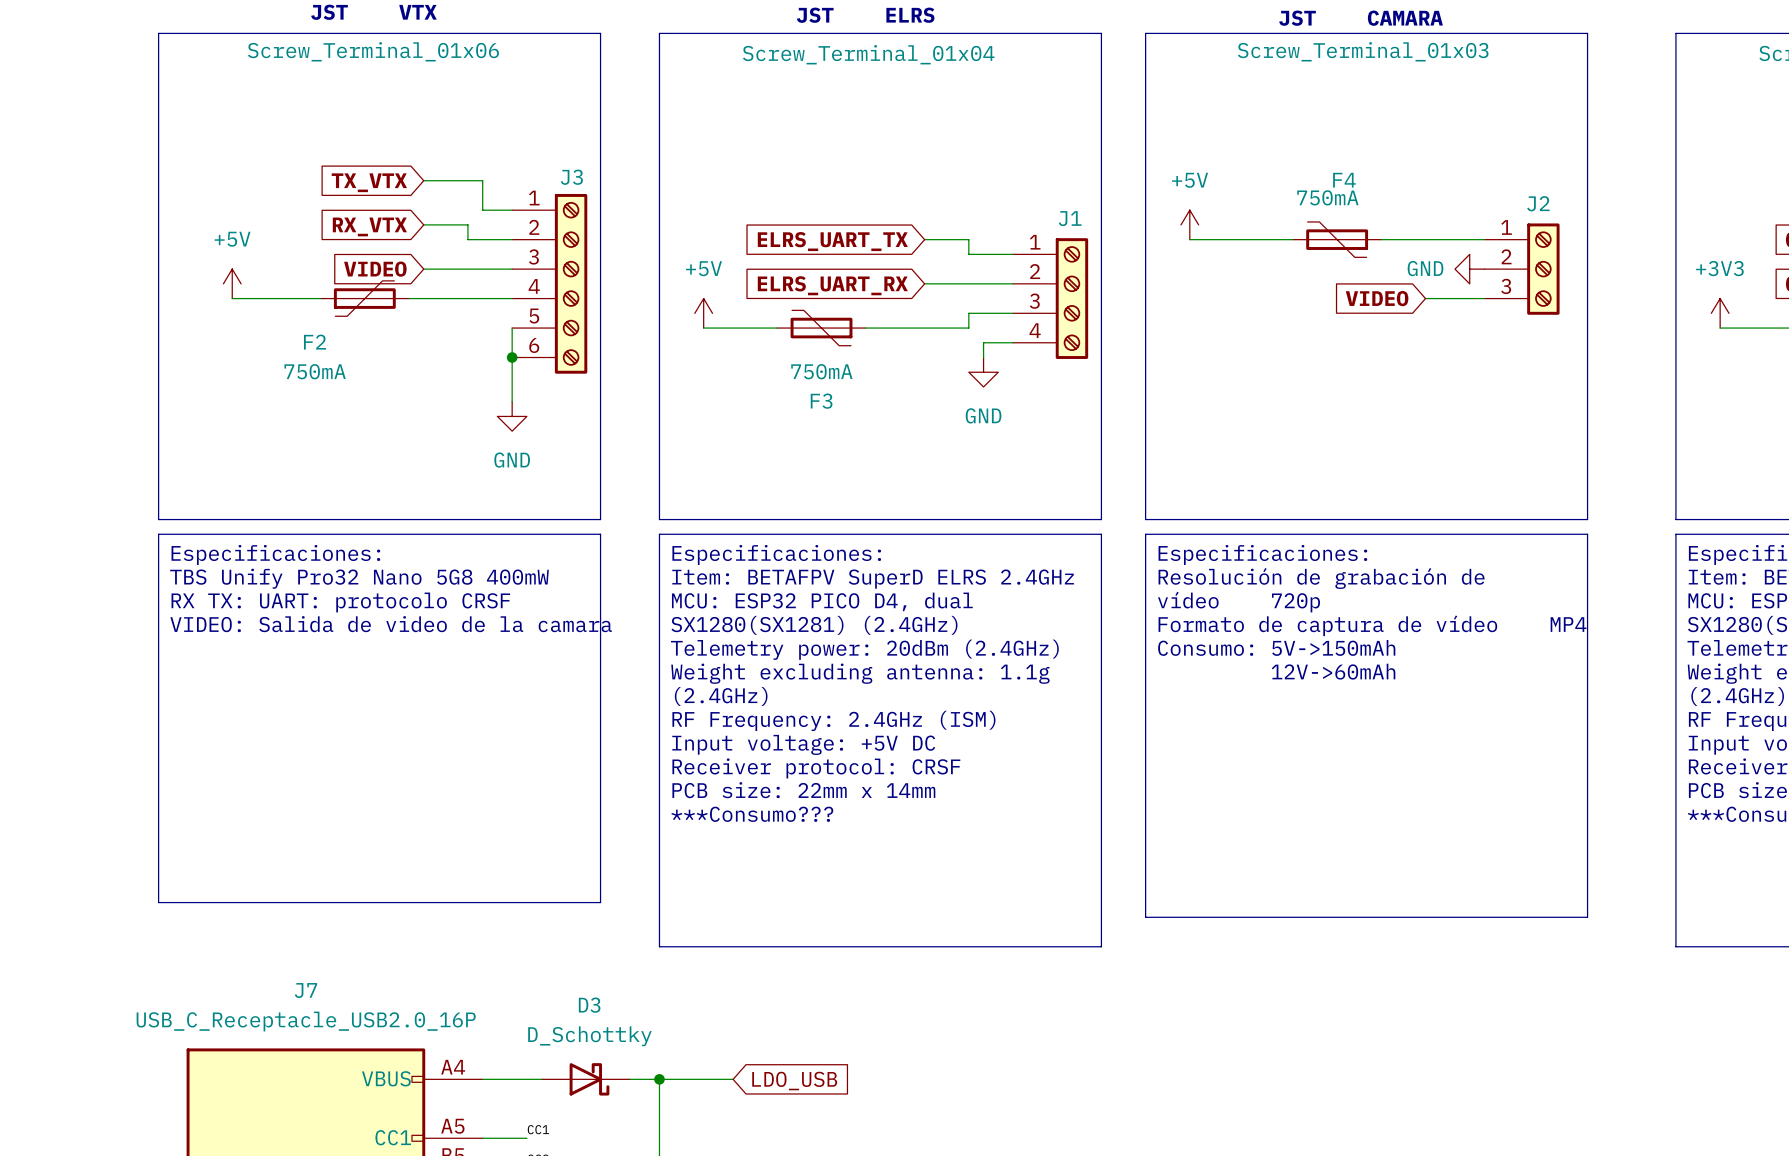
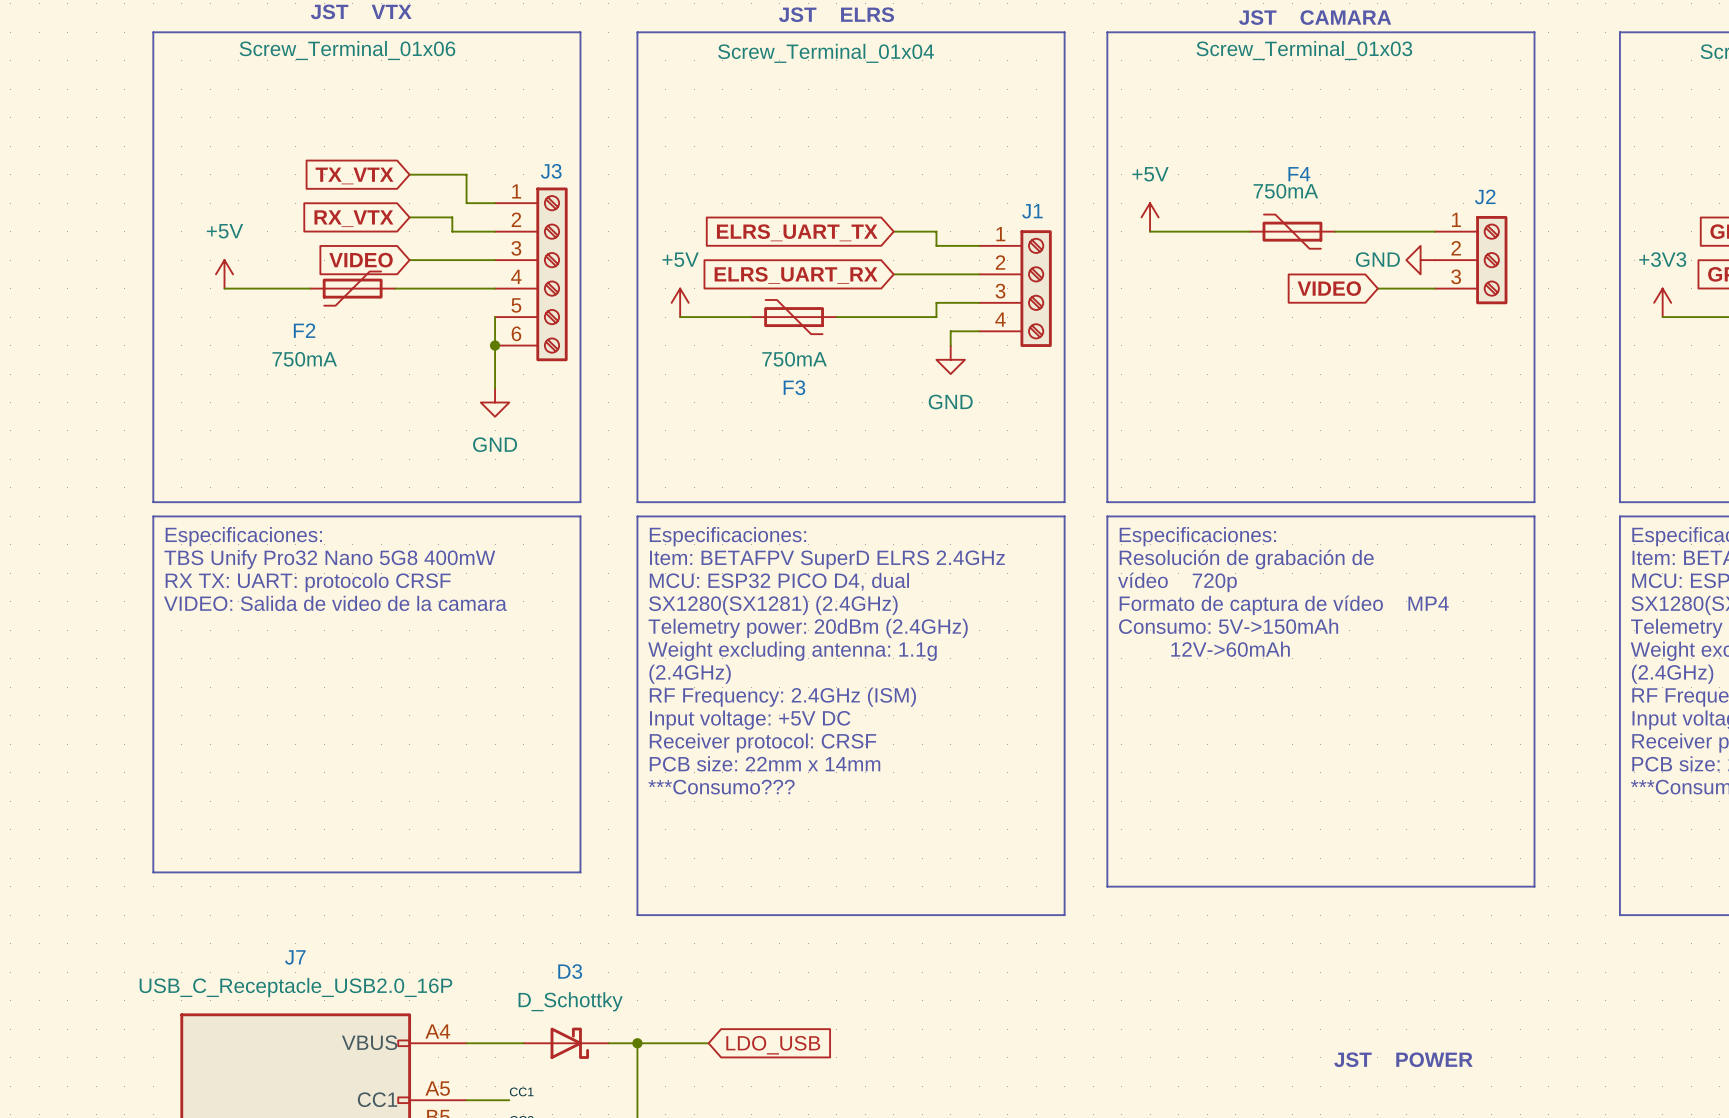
text: none -> JST POWER (1403, 1059)

